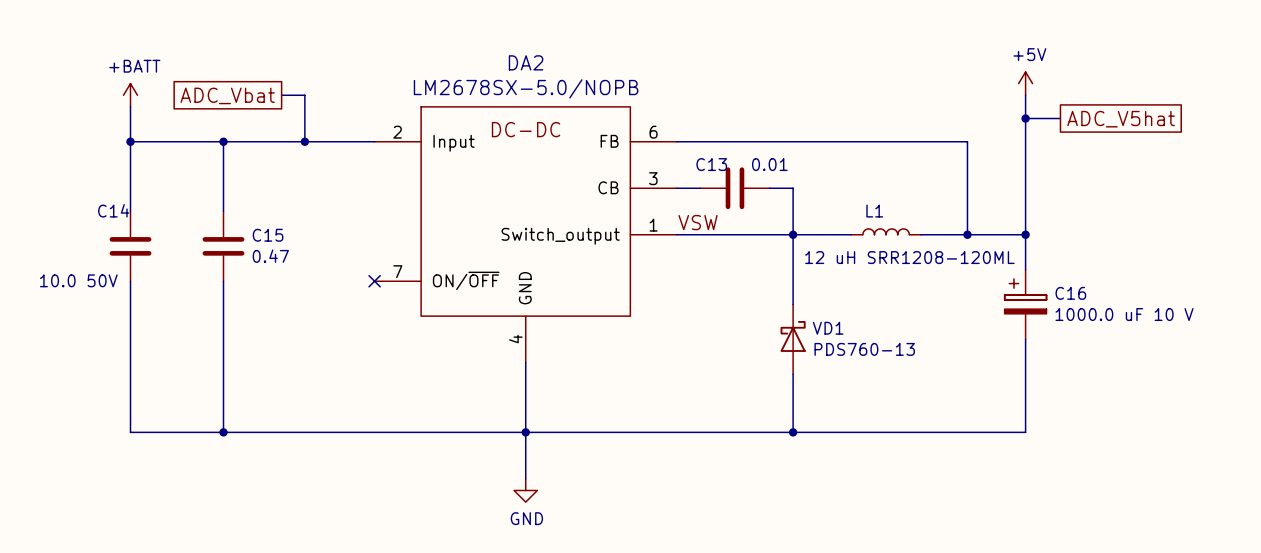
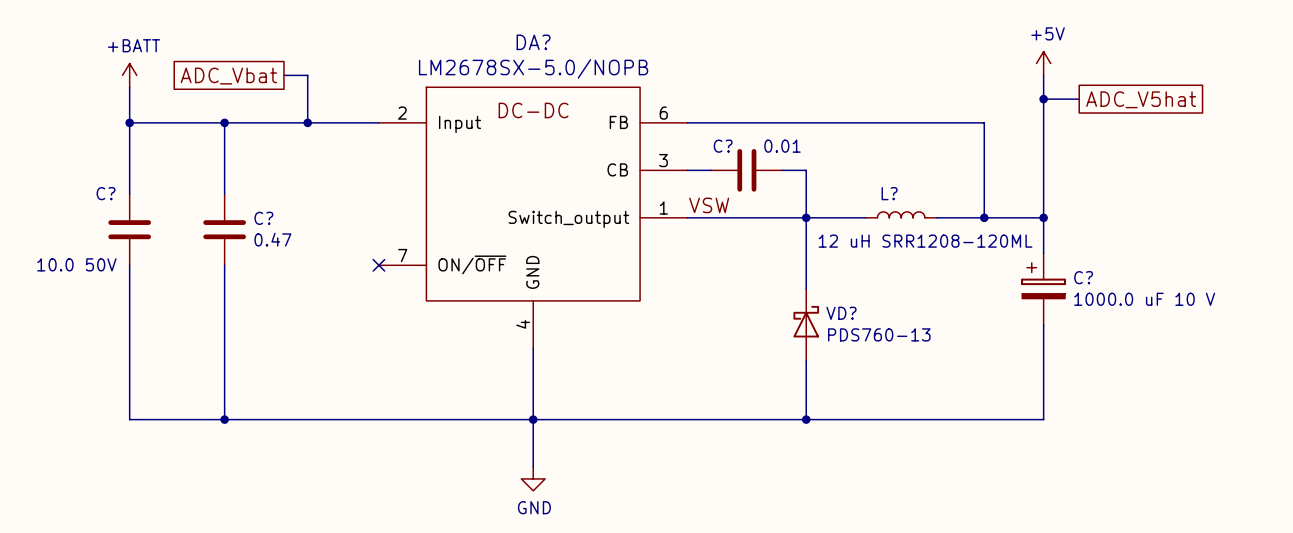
DA2 name: DA2 (526, 62) -> DA? (533, 42)
C13 name: C13 (711, 164) -> C? (723, 146)
C14 name: C14 (113, 210) -> C? (106, 193)
L1 name: L1 (874, 211) -> L? (889, 193)
C15 name: C15 (268, 235) -> C? (263, 218)
C16 name: C16 (1070, 293) -> C? (1083, 277)
VD1 name: VD1 (828, 328) -> VD? (841, 313)

